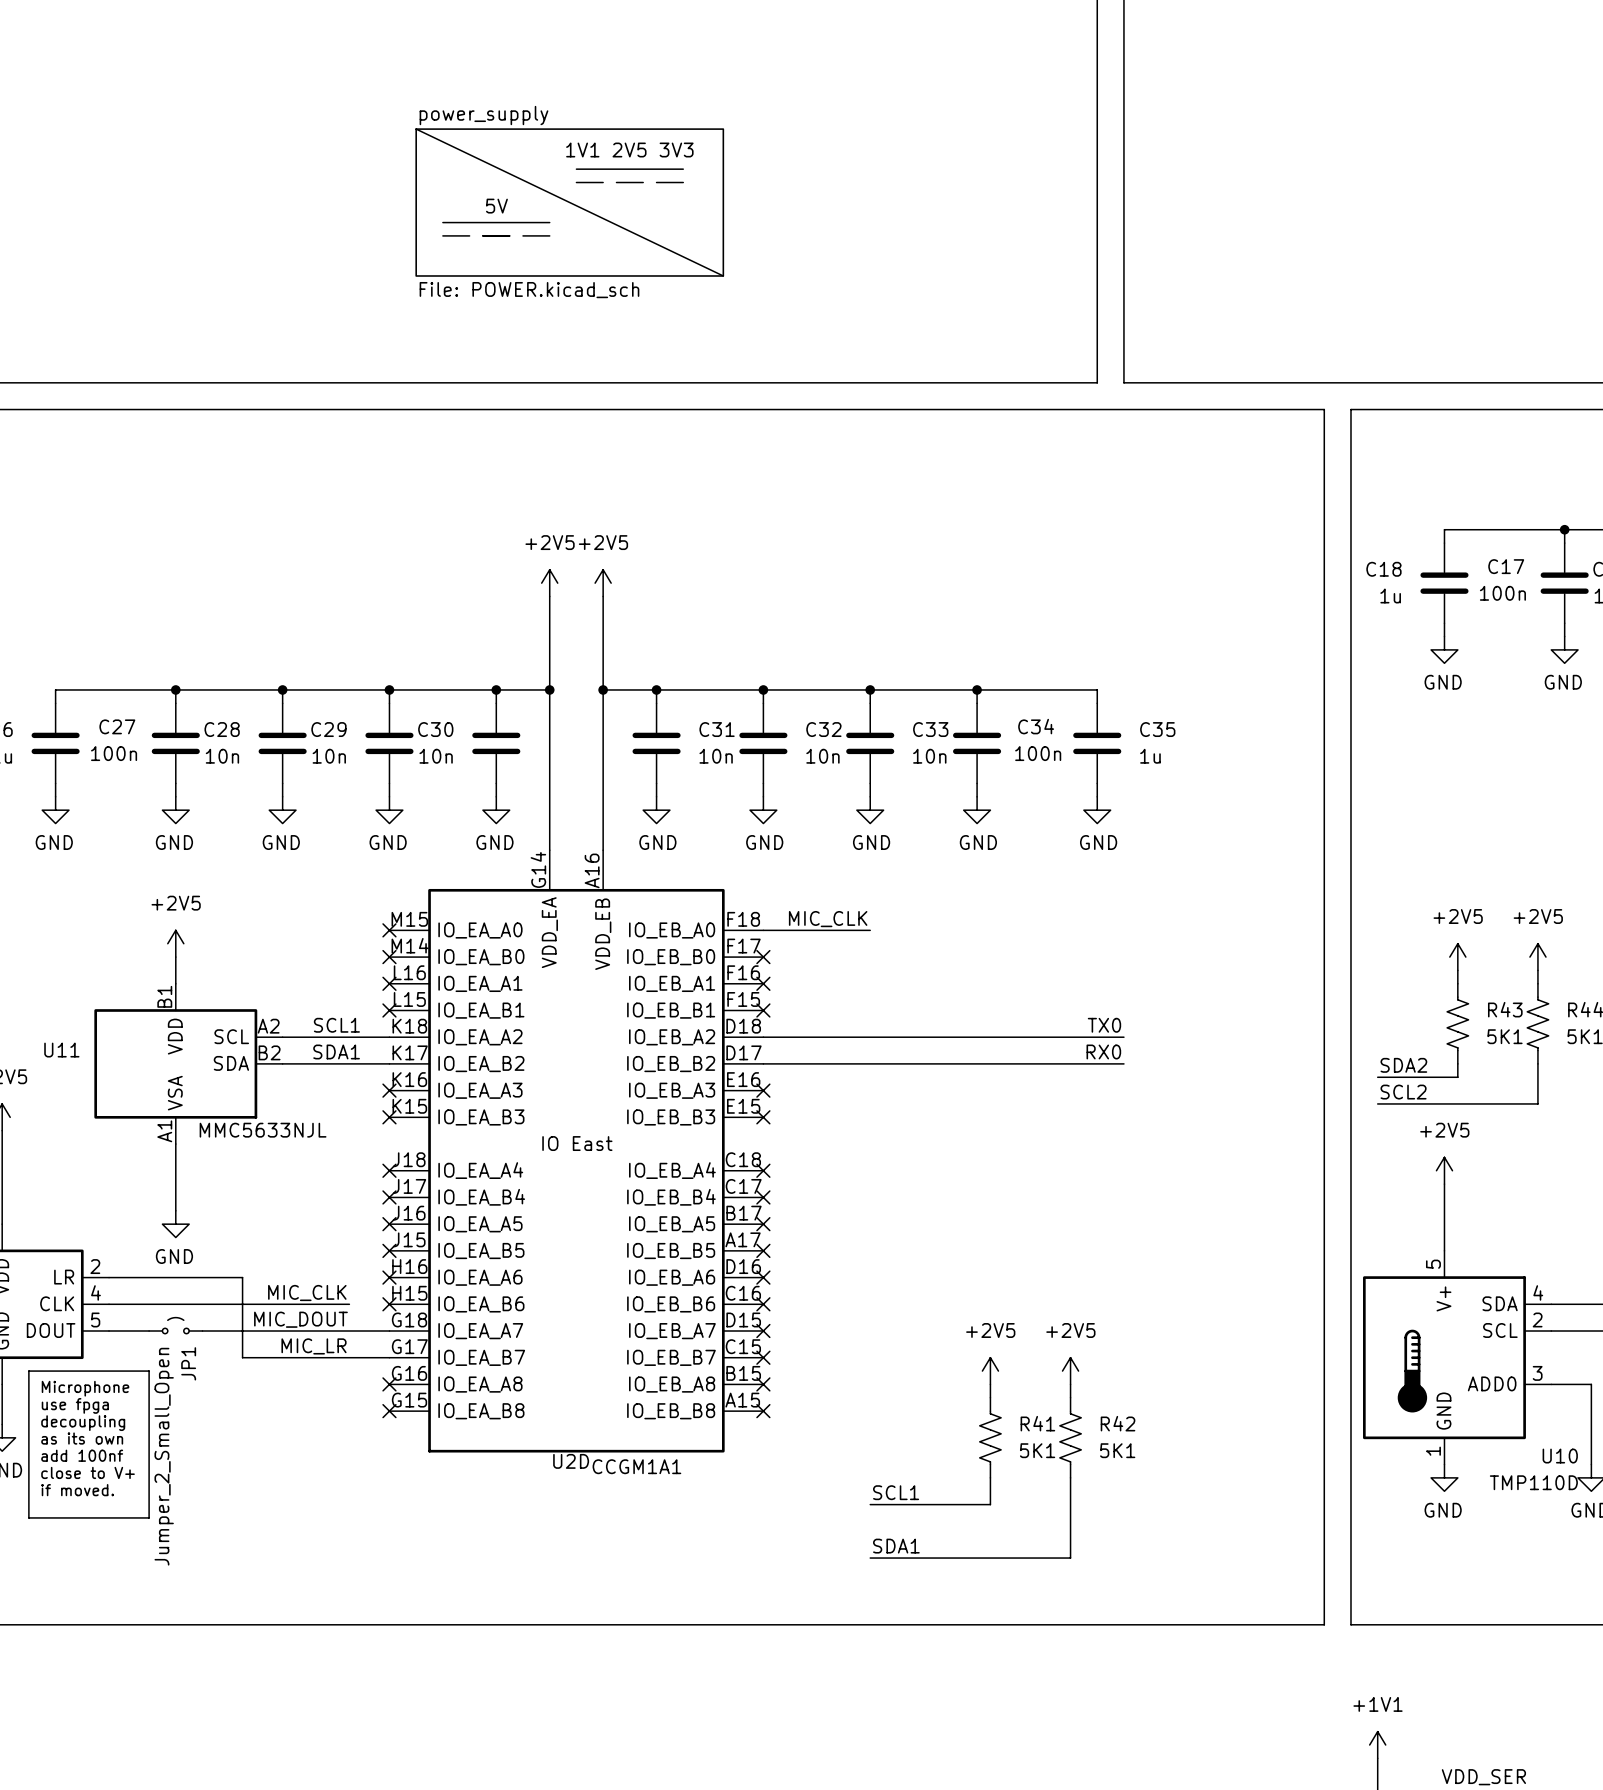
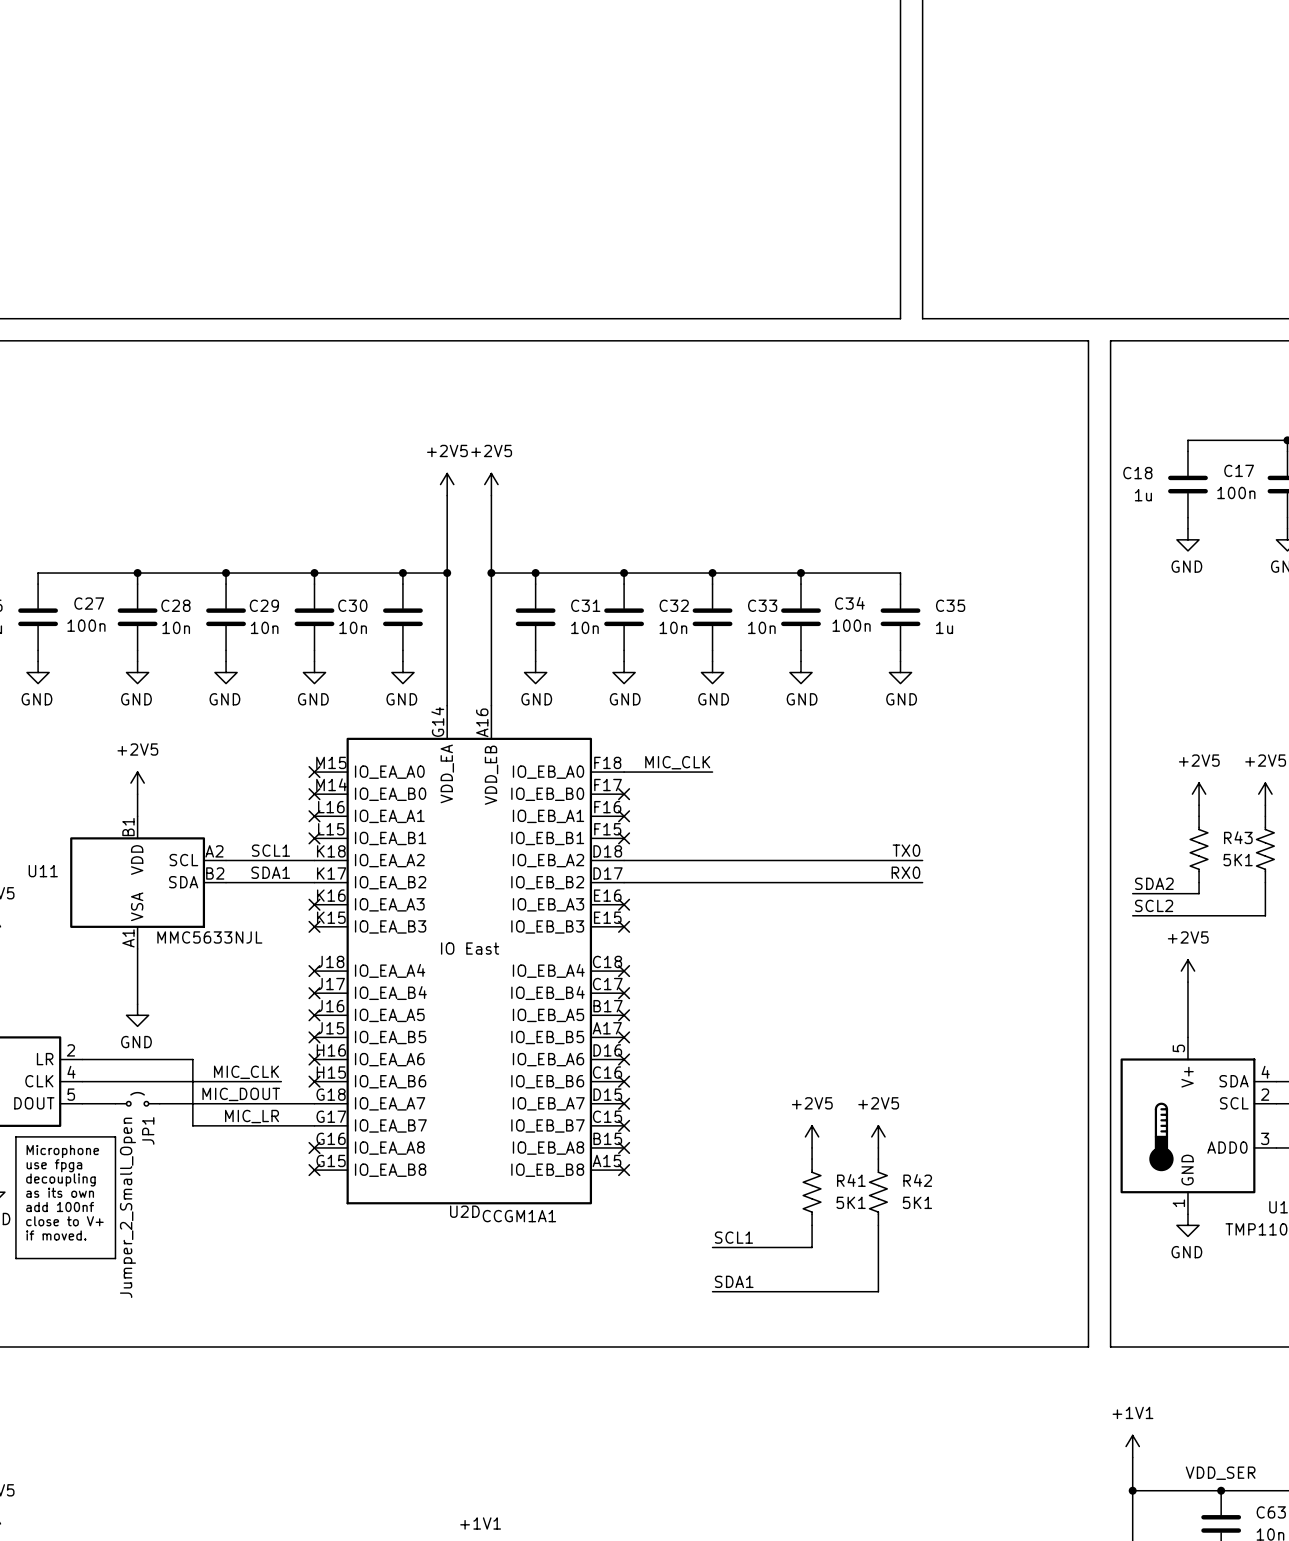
line: (416, 129) (723, 275) -> none
text: 1V1 2V5 3V3 (629, 150) -> none
line: (576, 169) (683, 169) -> none
line: (576, 182) (603, 182) -> none
line: (616, 182) (643, 182) -> none
line: (656, 182) (683, 182) -> none
sheet power_supply: File: POWER.kicad_sch (569, 202) -> none
text: 5V (496, 206) -> none
line: (442, 222) (549, 222) -> none
line: (442, 235) (469, 235) -> none
line: (482, 235) (509, 235) -> none
line: (523, 235) (549, 235) -> none

